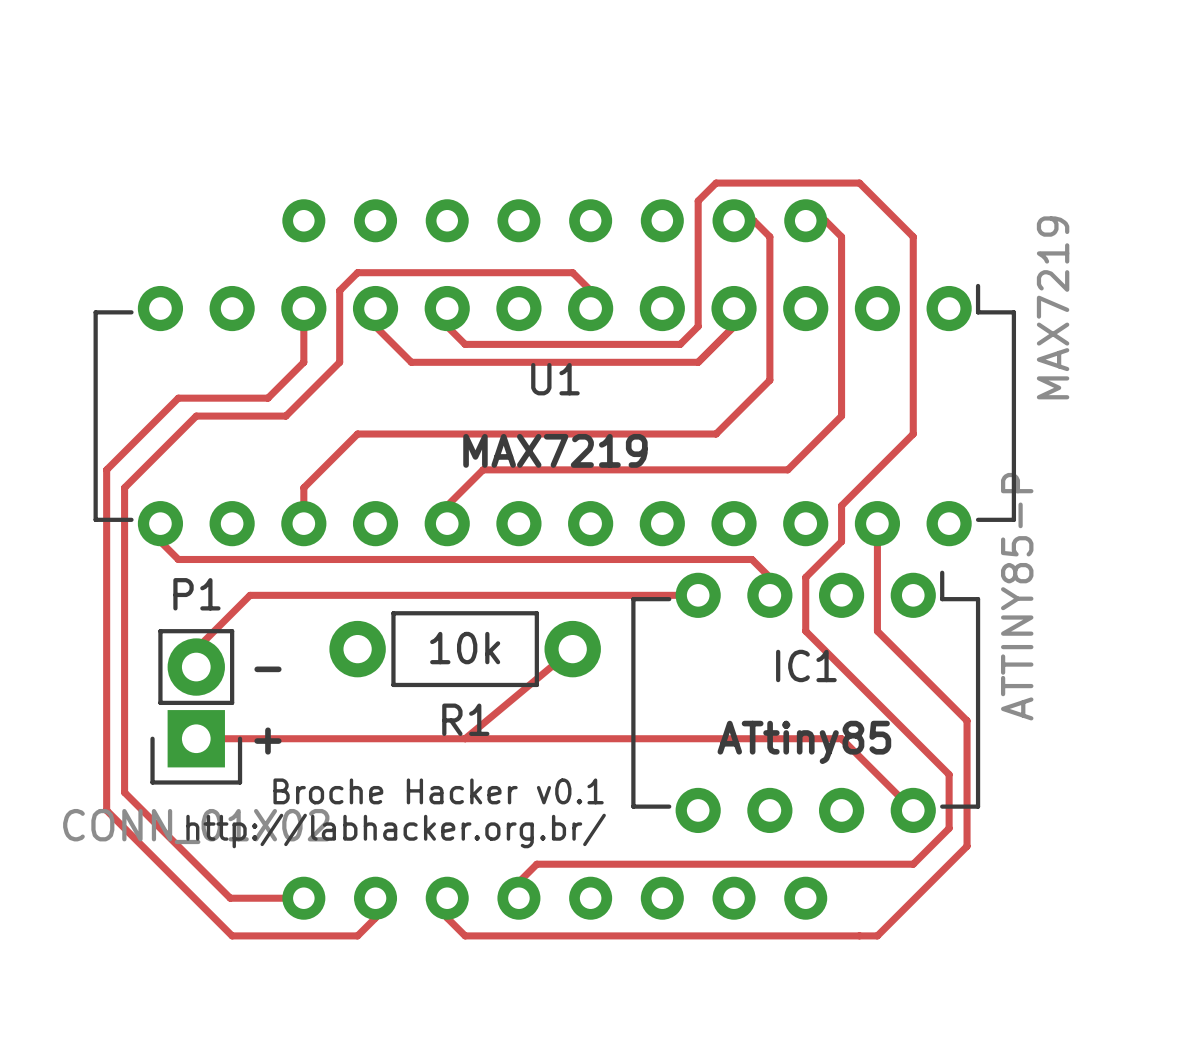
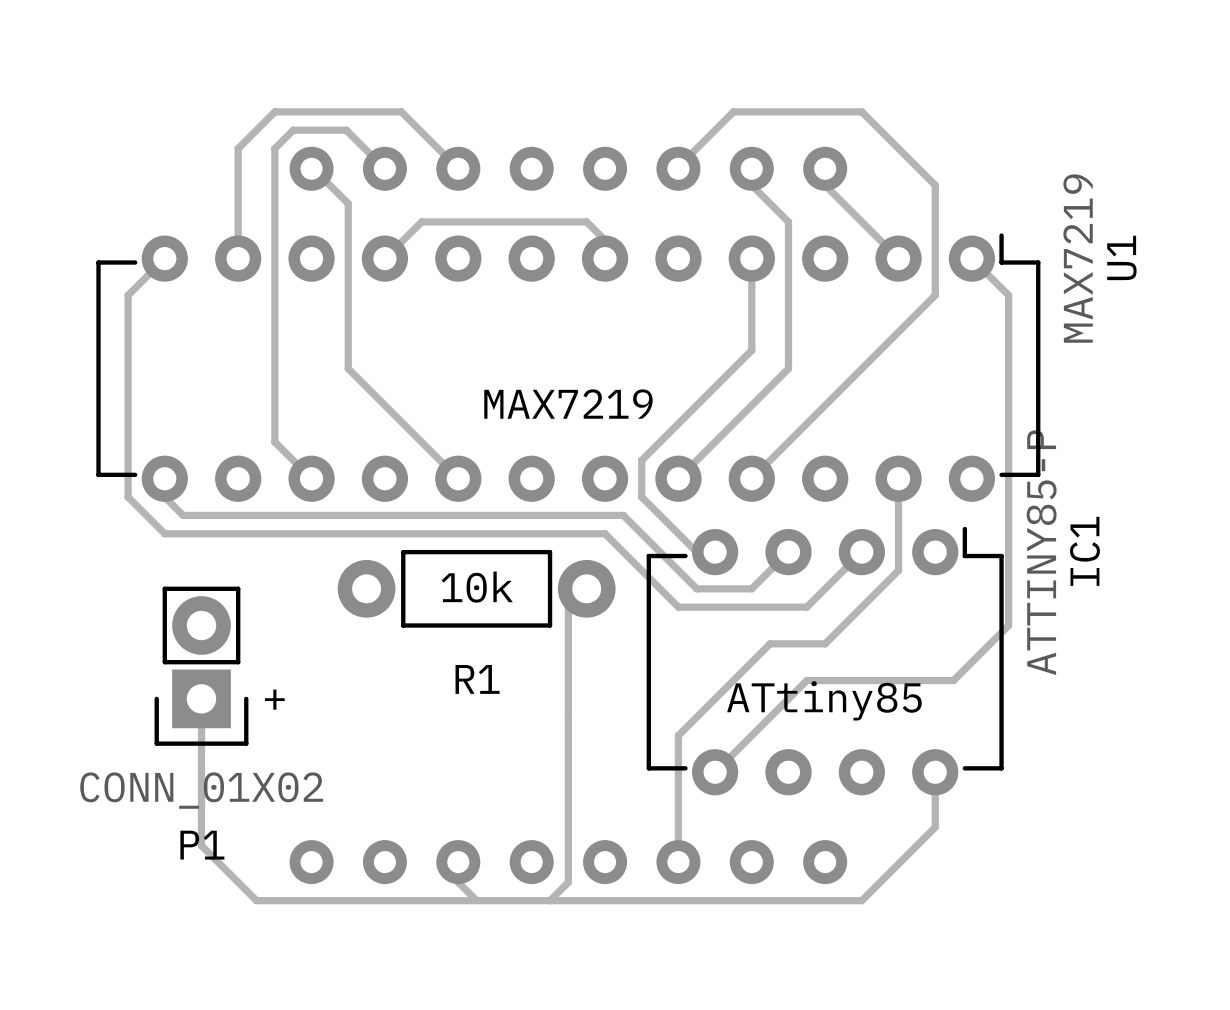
track: (859, 183) (716, 183) (698, 200) (698, 326) (680, 344) (465, 344) (447, 326) (447, 308) -> (880, 130) (861, 111) (733, 111) (678, 168)
track: none -> (313, 168) (348, 203) (348, 240)
track: none -> (384, 168) (346, 130) (293, 130) (274, 148) (274, 442) (311, 478)
track: none -> (458, 168) (401, 111) (274, 111) (238, 148) (238, 258)
track: (734, 220) (753, 220) (769, 236) (769, 272) -> (751, 185) (788, 221)
track: (805, 220) (825, 220) (841, 236) (841, 416) -> (935, 295) (861, 368)
track: none -> (825, 185) (898, 258)
track: (411, 272) (357, 272) (339, 290) -> (421, 221) (384, 258)
track: (375, 290) (375, 326) (411, 362) (698, 362) (734, 326) -> (696, 552) (641, 497) (641, 460) (751, 350) (751, 276)
track: (303, 308) (303, 362) (267, 398) (178, 398) (106, 469) (106, 810) (232, 935) (250, 935) -> (201, 698) (201, 845) (256, 900)
track: none -> (971, 258) (1008, 295) (1008, 625) (953, 680) (806, 680) (715, 772)
track: (913, 344) (913, 434) (841, 505) (841, 541) (805, 577) (805, 631) (949, 774) (949, 828) (913, 864) (536, 864) (518, 882) (518, 898) -> none
track: (339, 362) (285, 416) (196, 416) (124, 487) -> (164, 258) (128, 295) (128, 442)
track: none -> (348, 313) (348, 368) (458, 478)
U1 name rotation: 0° (555, 379) -> 90° counterclockwise (1121, 257)
U1 name position: U1 (555, 379) -> U1 (1121, 257)
track: (769, 380) (716, 434) (357, 434) (303, 487) (303, 523) -> (788, 332) (788, 368) (678, 478)
track: (787, 469) (483, 469) (447, 505) (447, 541) -> (806, 423) (751, 478)
track: (124, 541) (124, 792) (230, 898) (303, 898) -> (128, 497) (164, 533) (605, 533) (678, 607) (806, 607) (861, 552)
track: (608, 559) (751, 559) (769, 577) (769, 595) -> (623, 515) (696, 588) (751, 588) (788, 552)
P1 name position: P1 (196, 594) -> P1 (202, 845)
track: (680, 595) (250, 595) (196, 649) (196, 667) -> none
track: (877, 613) (877, 631) (967, 720) (967, 846) (877, 935) (841, 935) -> (898, 570) (825, 643) (770, 643) (678, 735) (678, 862)
track: none -> (586, 588) (568, 607) (568, 882) (550, 900)
R1 position: (465, 649) -> (476, 588)
IC1 name rotation: 0° (806, 665) -> 90° counterclockwise (1084, 551)
IC1 name position: IC1 (806, 665) -> IC1 (1084, 551)
track: (554, 667) (572, 649) (465, 738) -> none
text: - (267, 669) -> none
track: (196, 738) (841, 738) (913, 810) -> (861, 900) (935, 827) (935, 772)
text: Broche Hacker v0.1 (438, 791) -> none
text: http://labhacker.org.br/ (396, 830) -> none
track: (375, 898) (375, 917) (357, 935) -> (476, 900) (366, 900)

